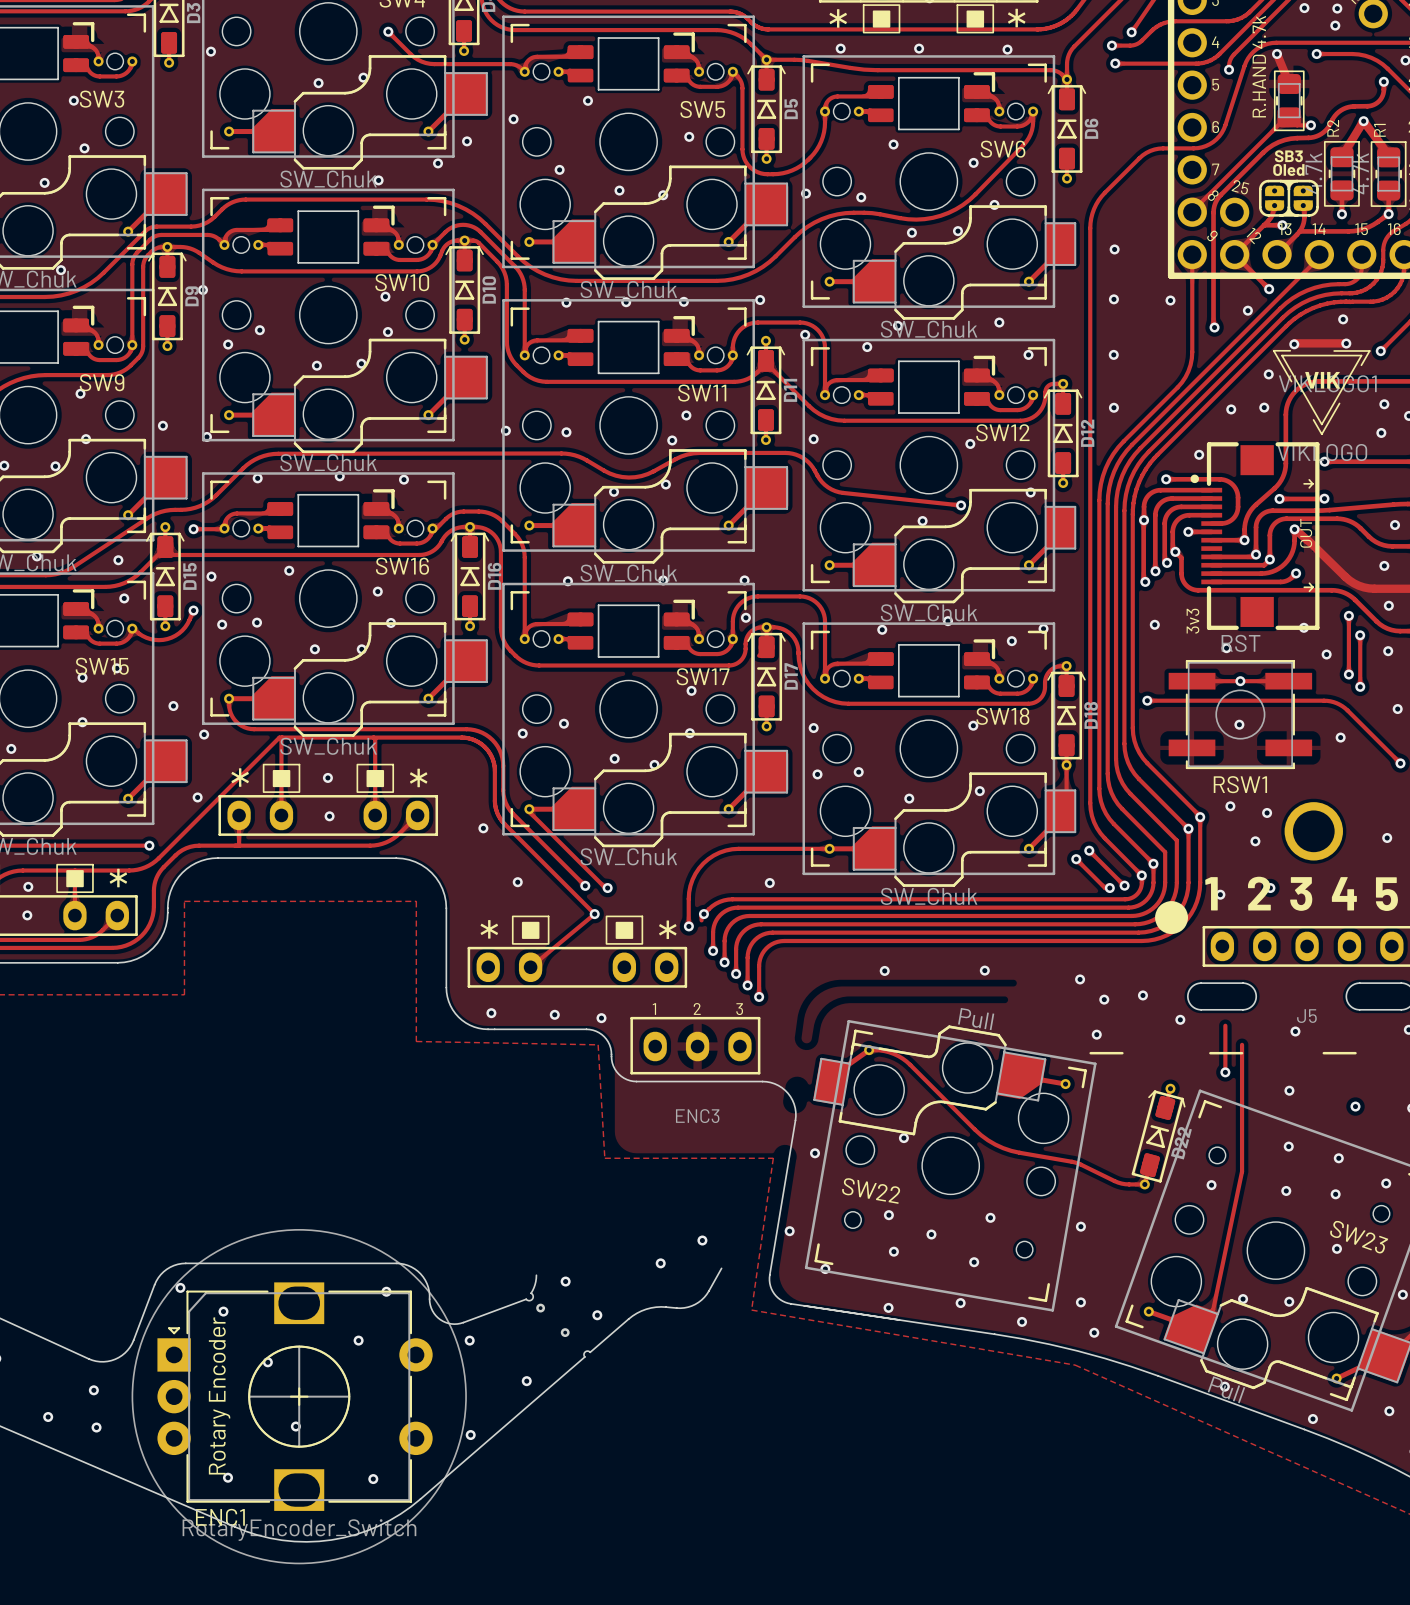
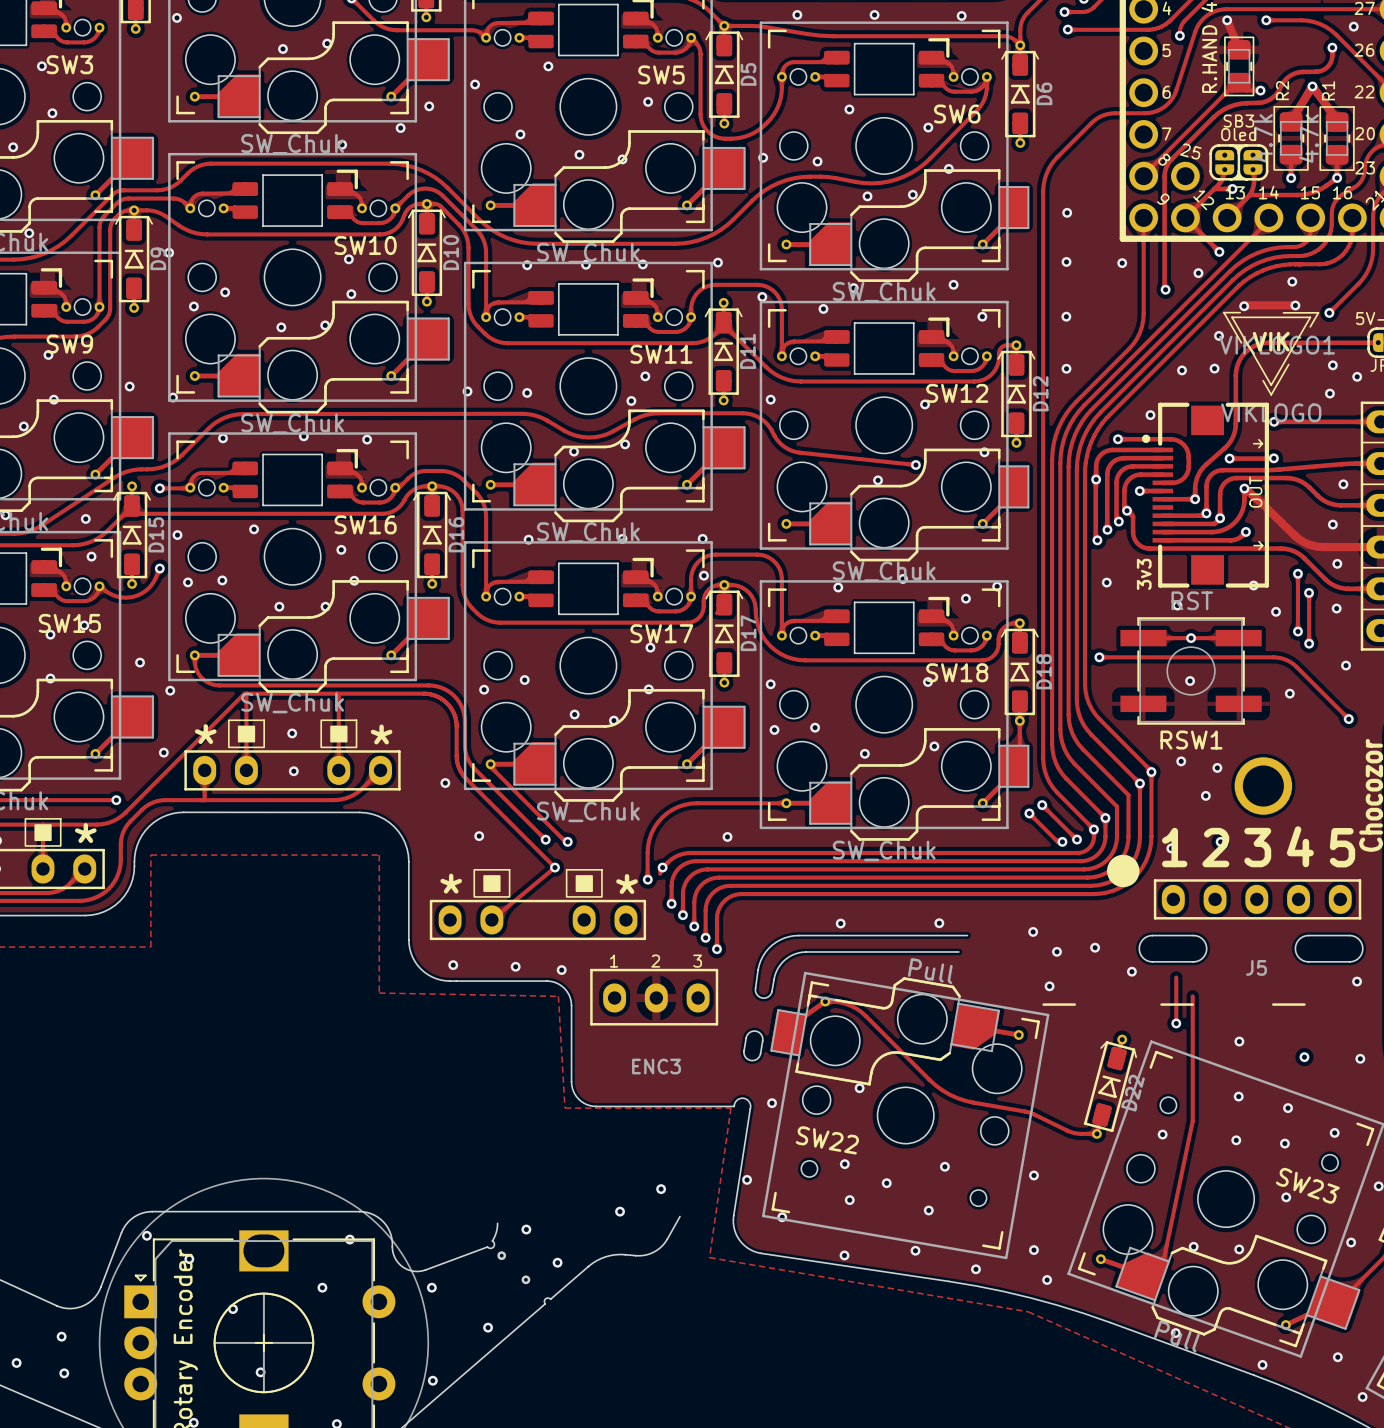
via: (1387, 837) -> none
board edge: none -> (967, 935) (789, 936) (775, 942) (762, 956) (758, 969) (755, 991) (761, 997) (769, 996) (779, 965) (788, 957) (798, 952) (958, 951)
via: (1295, 1031) -> none
board edge: (611, 1056) (613, 1066) (618, 1074) (633, 1081) (762, 1081) (774, 1083) (785, 1090) (794, 1104) (795, 1116) (769, 1274) (772, 1291) (778, 1297) (788, 1303) (899, 1320) -> (571, 1007) (571, 1085) (574, 1094) (583, 1103) (596, 1106) (734, 1106) (735, 1101) (739, 1098) (744, 1098) (748, 1101) (750, 1107) (733, 1223) (735, 1233) (742, 1243) (750, 1249) (761, 1253)
board edge: none -> (746, 1038) (744, 1055) (749, 1060) (755, 1059) (760, 1054) (762, 1036) (757, 1031) (752, 1031) (748, 1033) (746, 1038)

